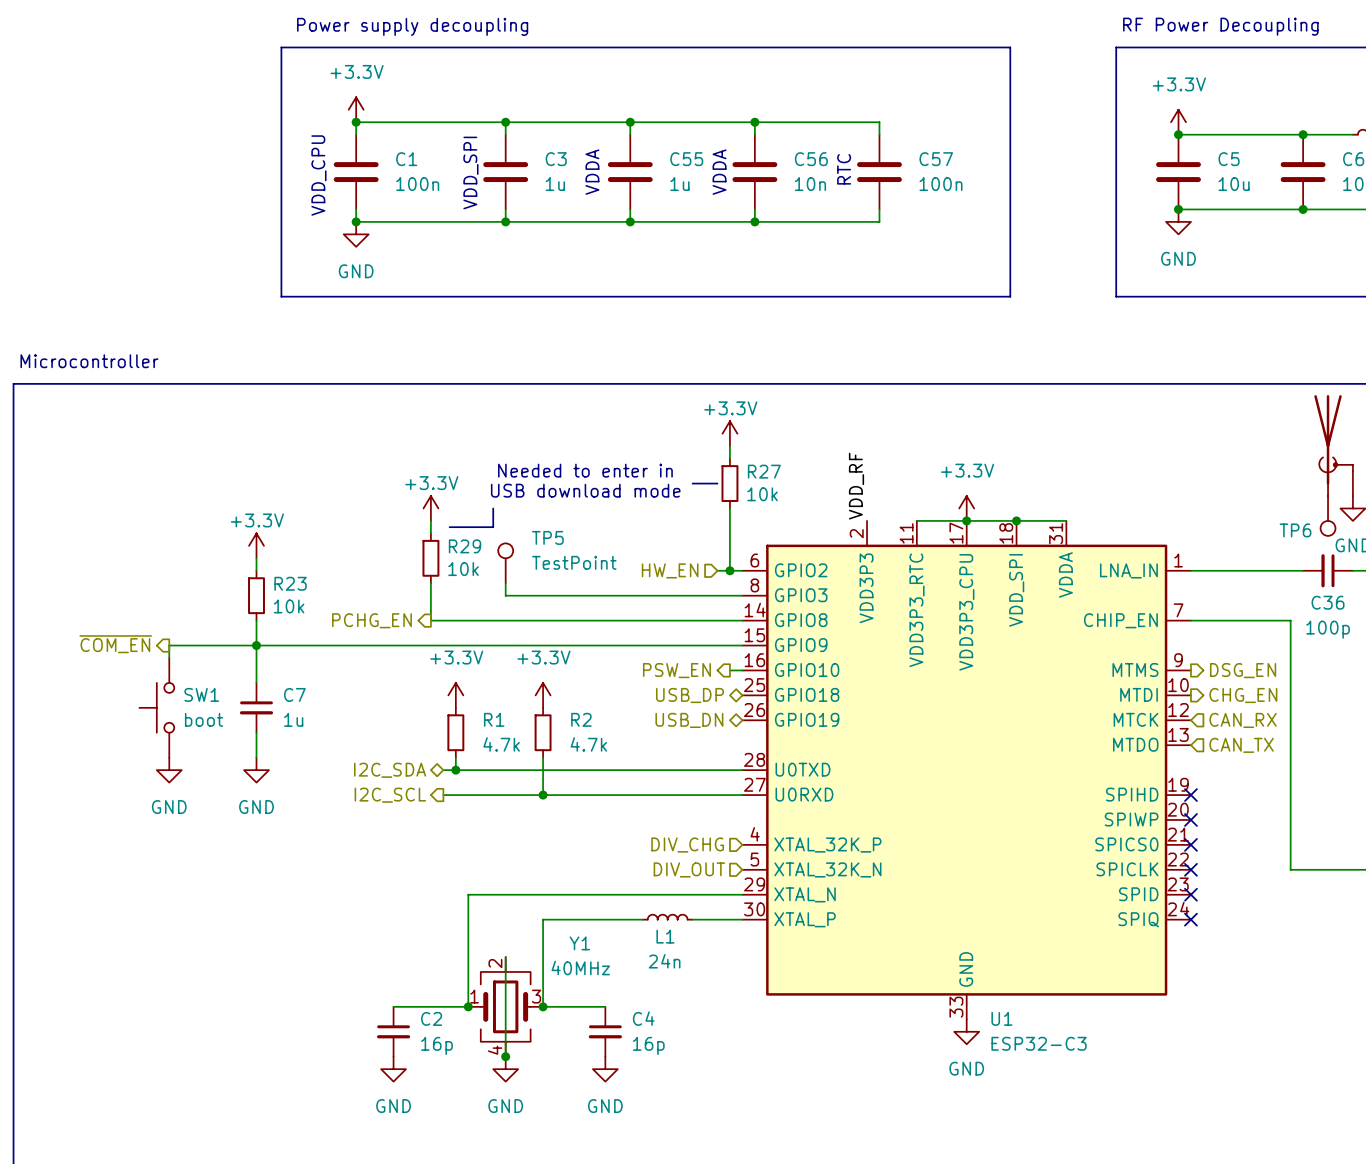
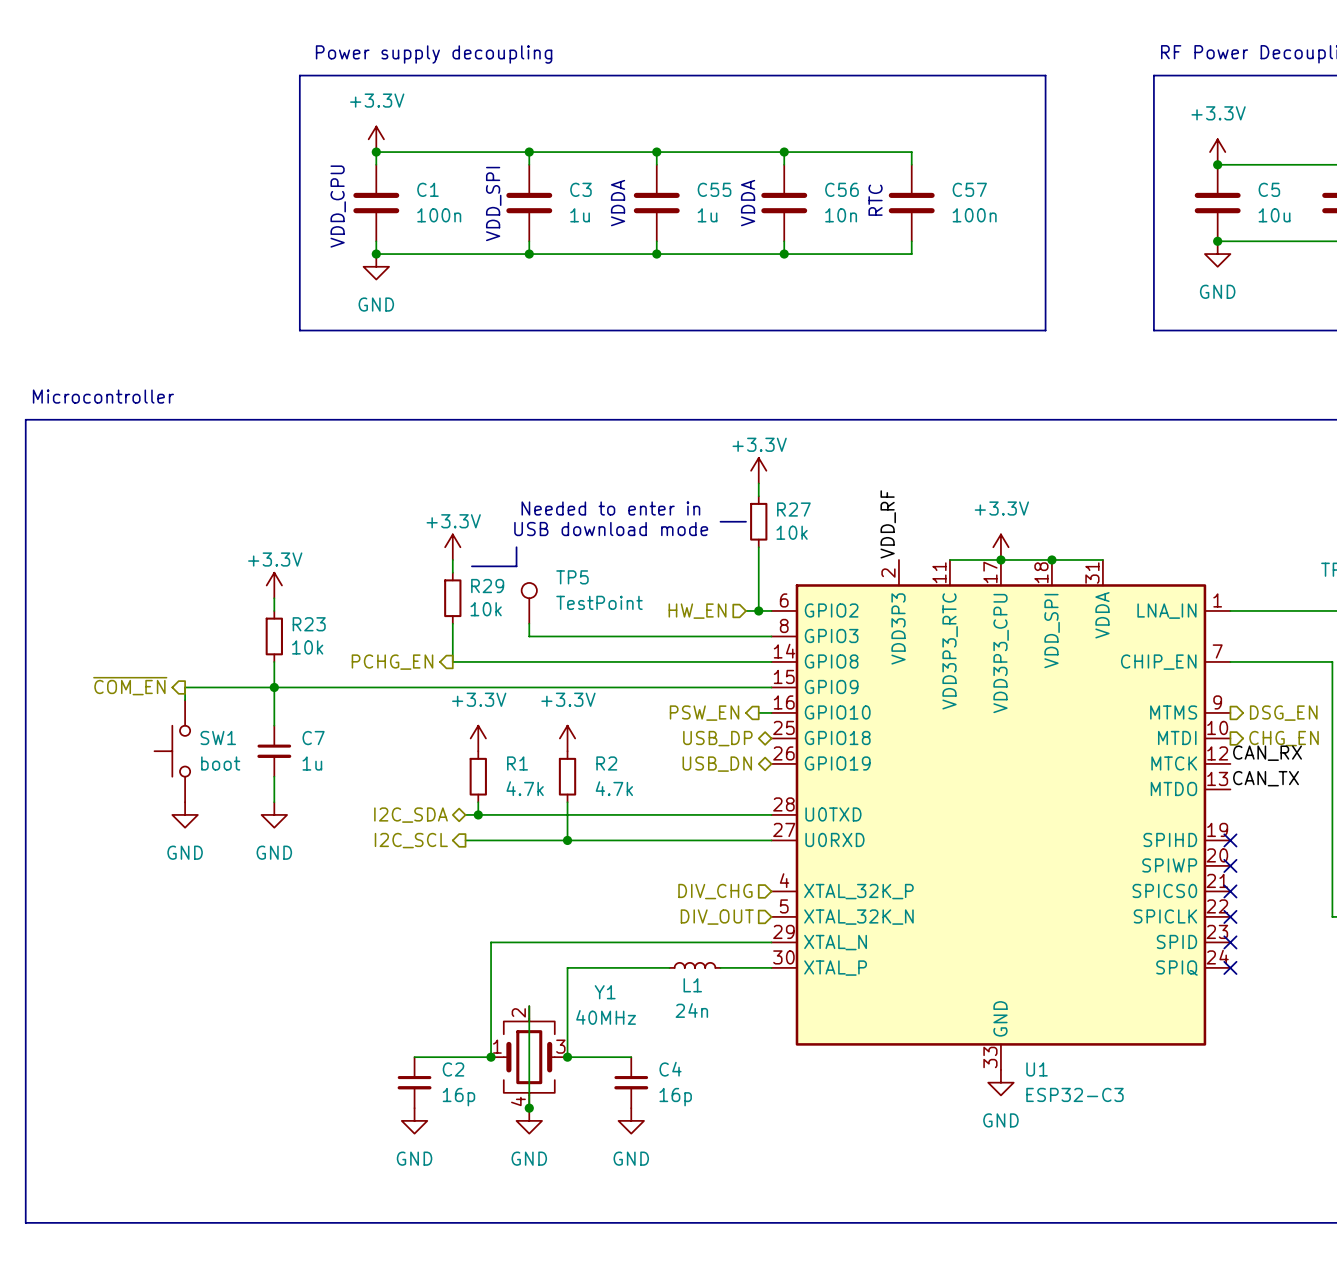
label: none -> CAN_RX (1267, 753)
hierarchical label: CAN_RX (1243, 720) -> none
label: none -> CAN_TX (1266, 778)
hierarchical label: CAN_TX (1241, 745) -> none

